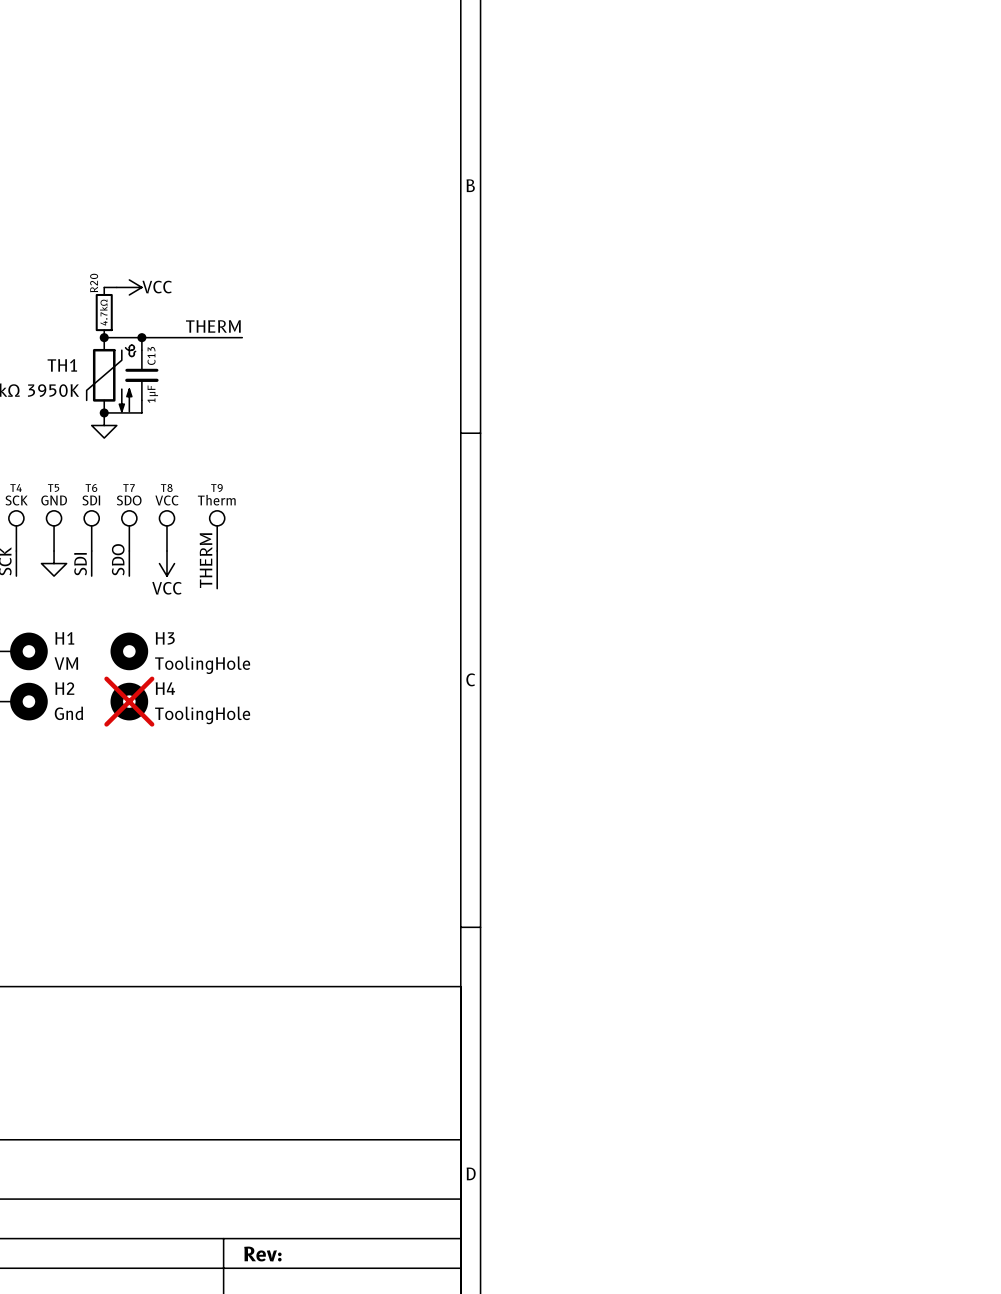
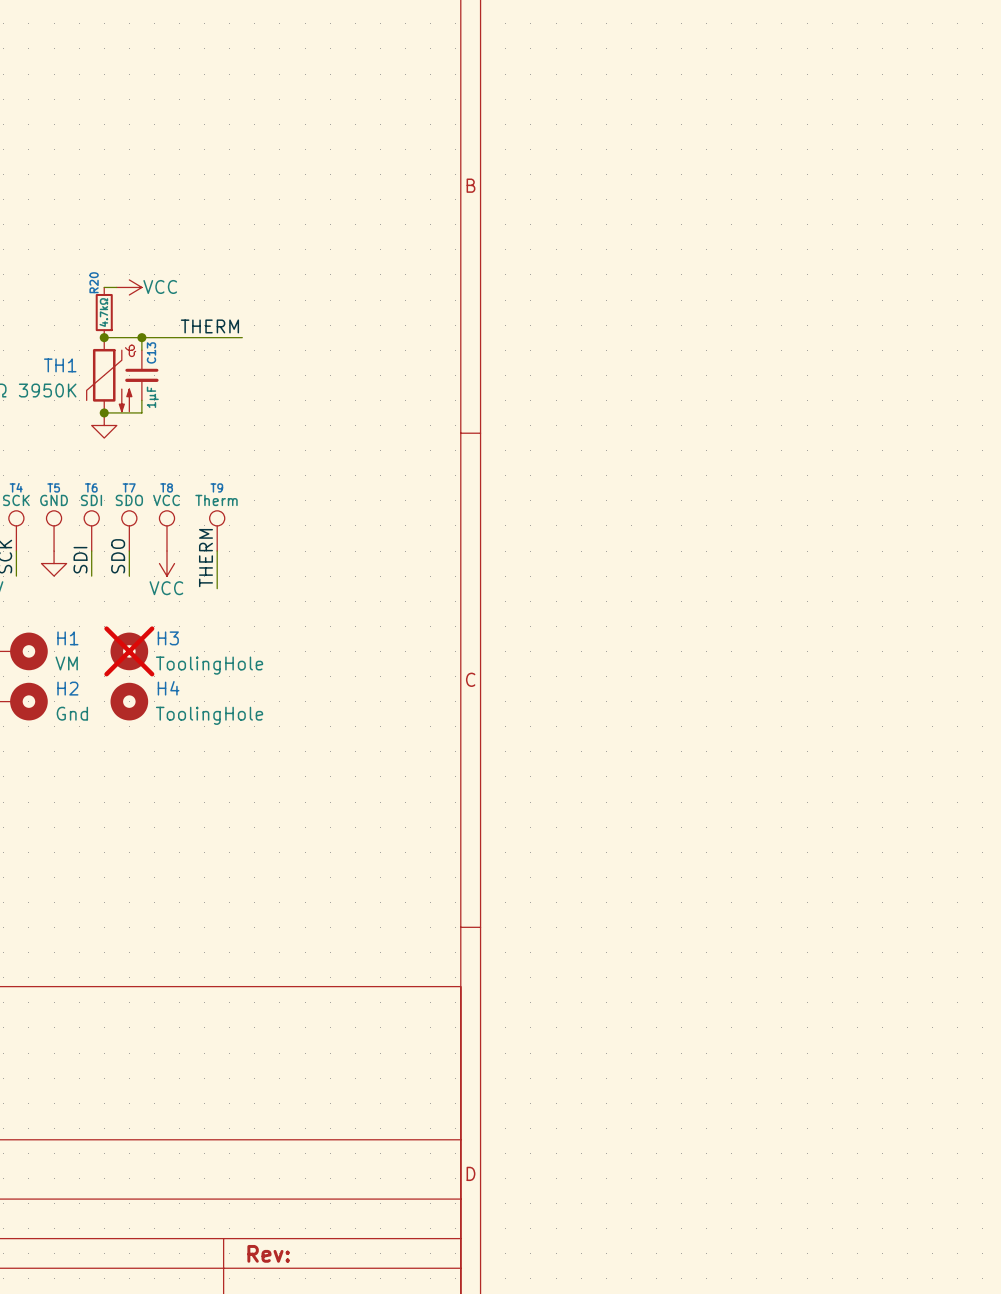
H3 do-not-place cross: none -> (129, 651)
H4 do-not-place cross: (129, 701) -> none

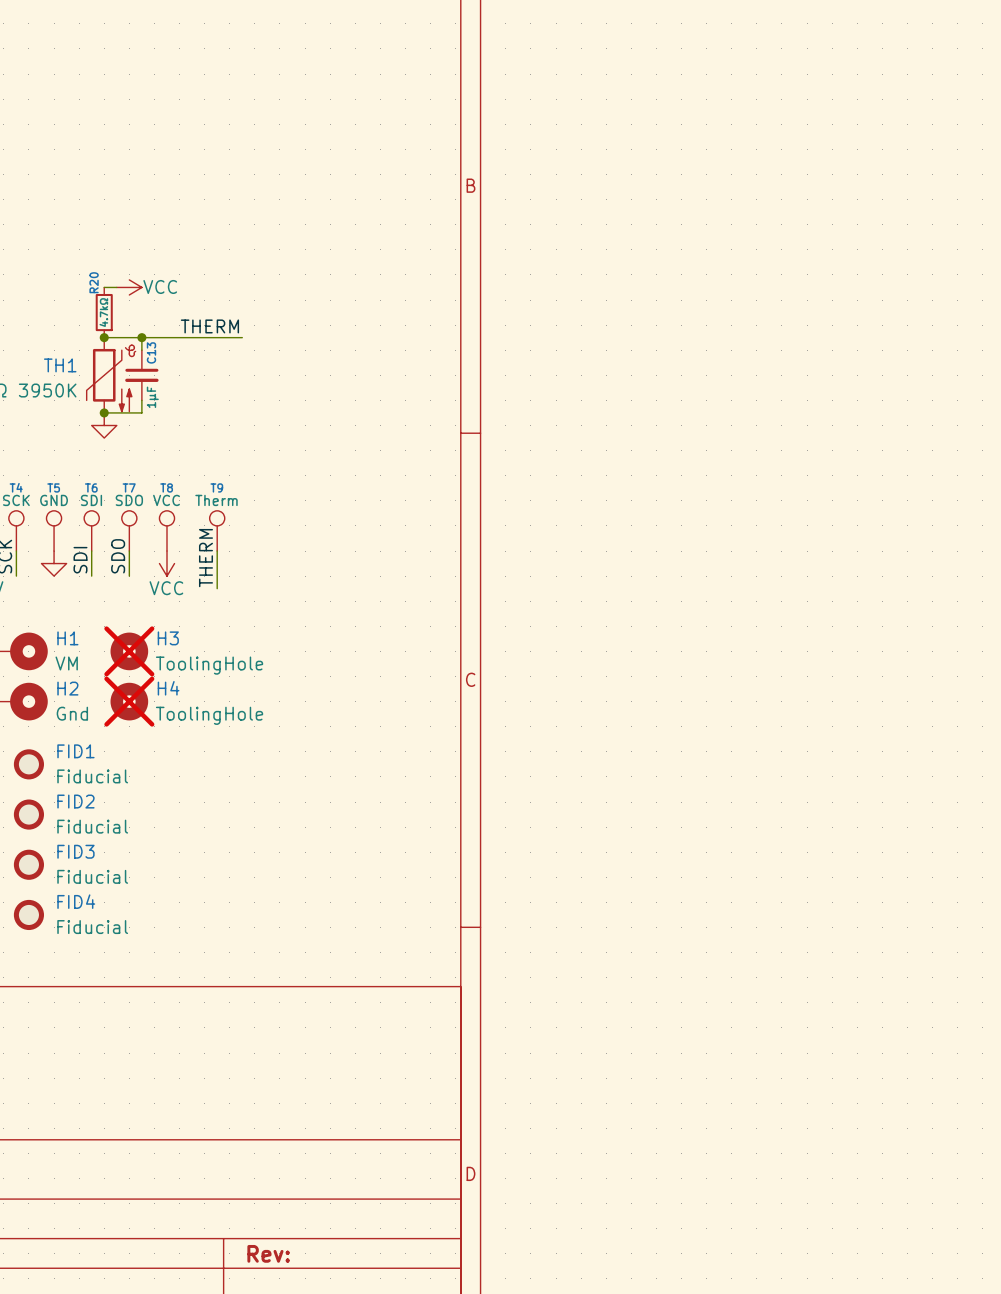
H4 do-not-place cross: none -> (129, 701)
FID1: none -> Fiducial (28, 764)
FID2: none -> Fiducial (28, 814)
FID3: none -> Fiducial (28, 864)
FID4: none -> Fiducial (28, 914)

